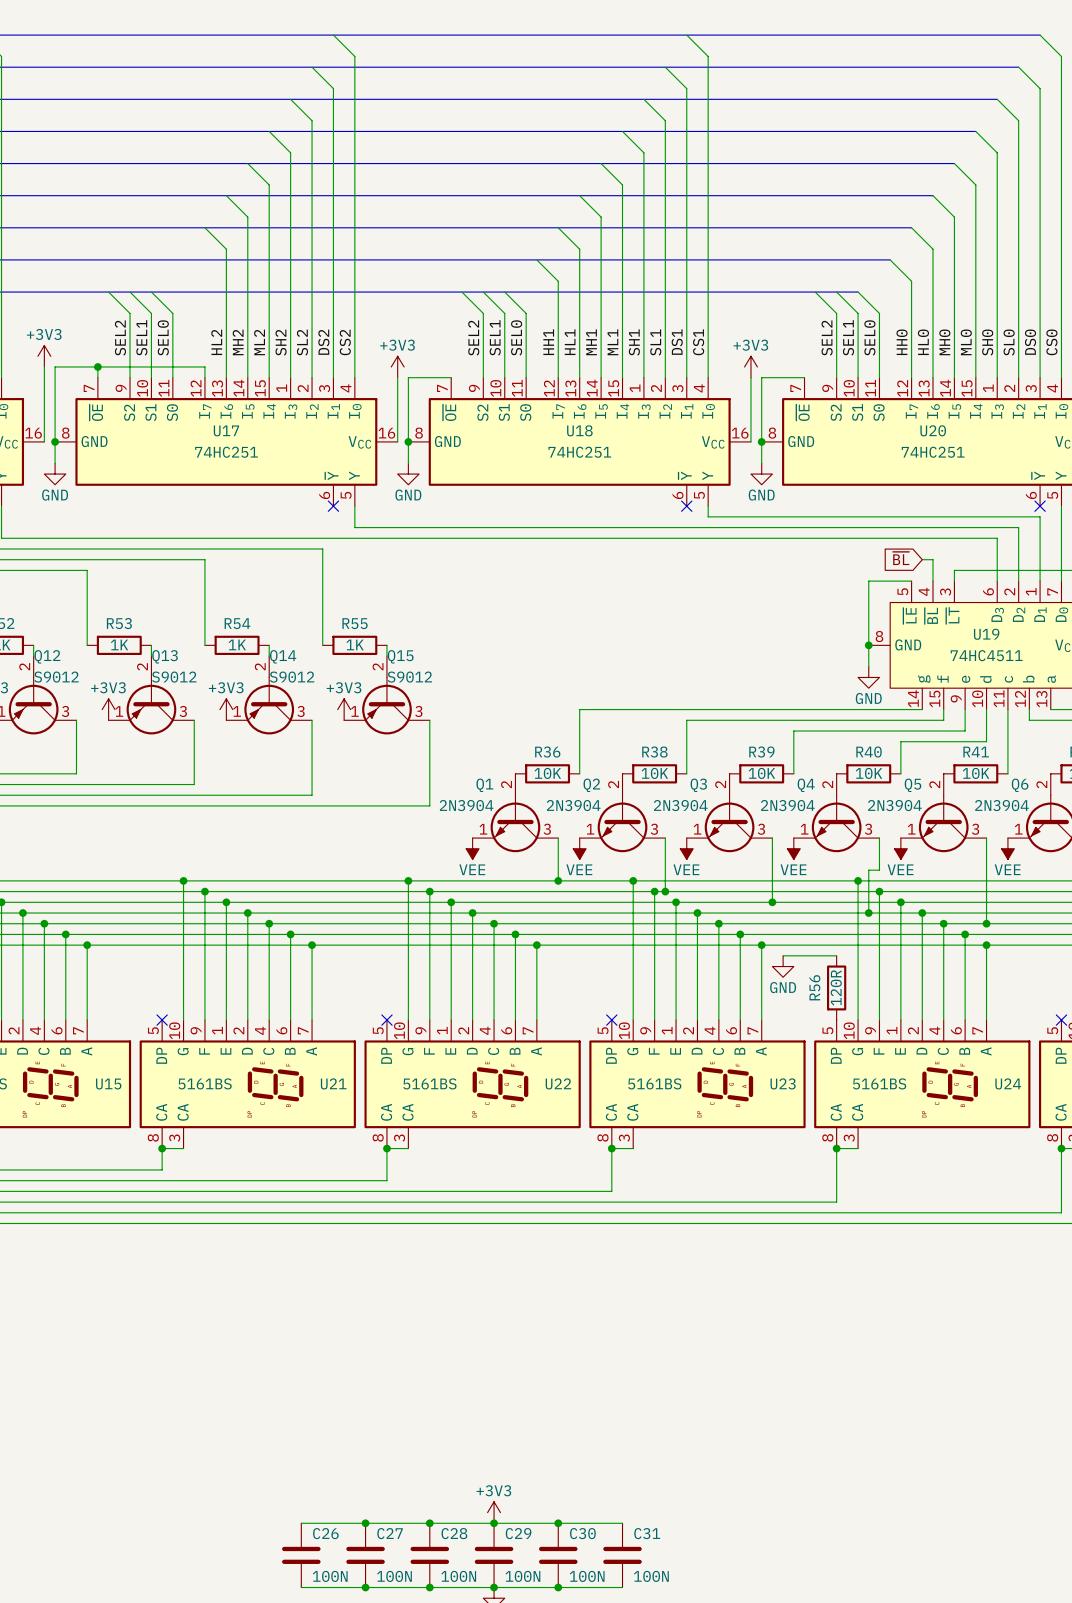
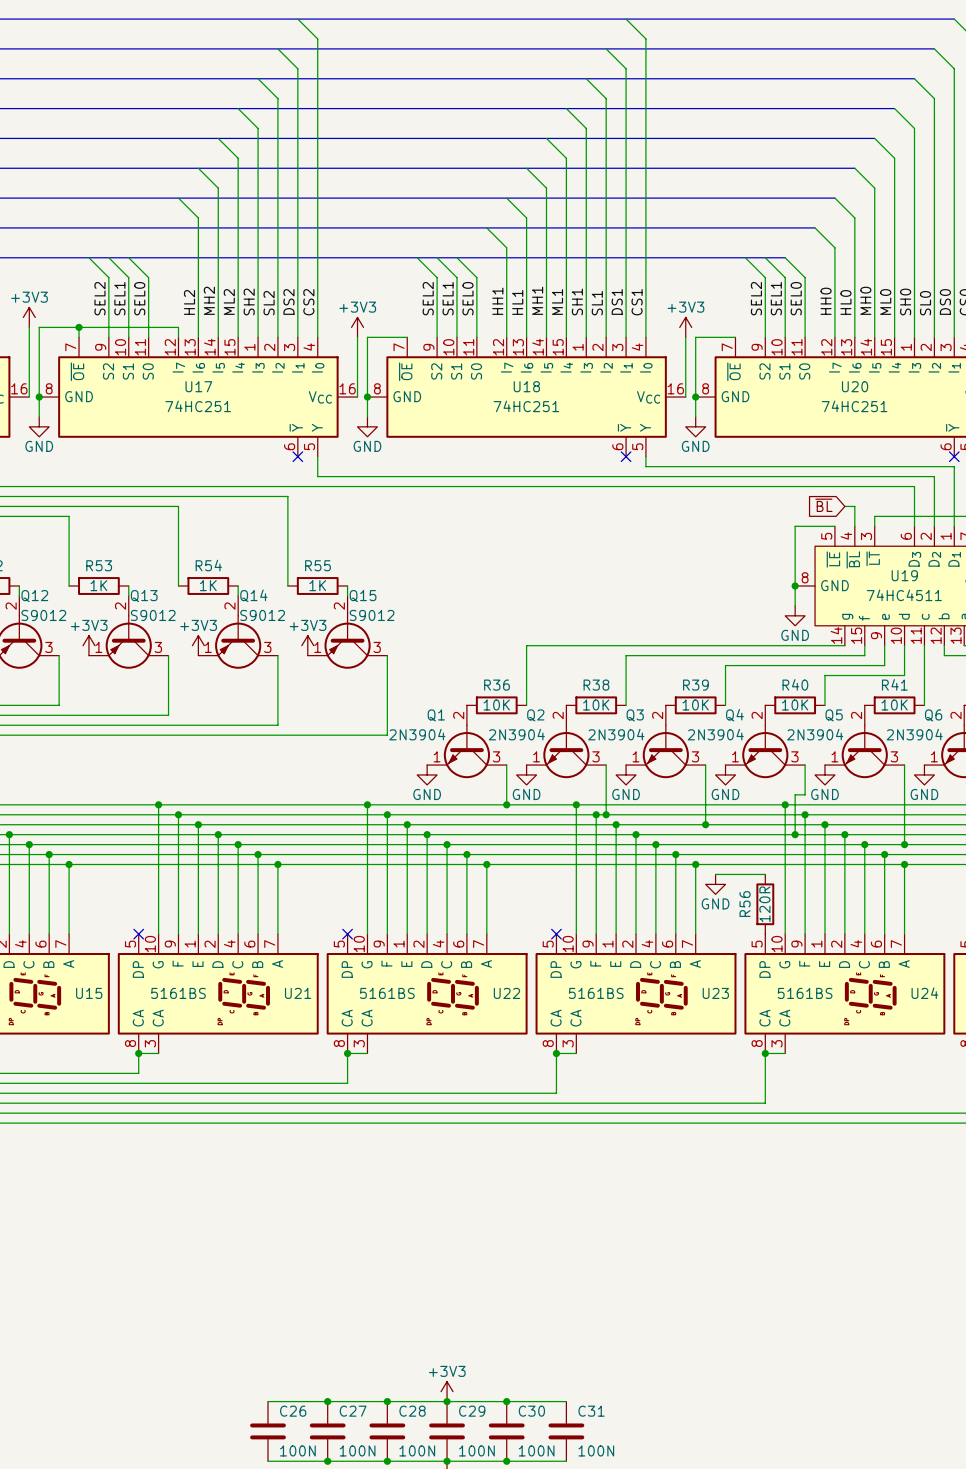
power symbol: VEE (472, 848) -> GND (427, 774)
power symbol: VEE (579, 848) -> GND (526, 774)
power symbol: VEE (686, 848) -> GND (626, 774)
power symbol: VEE (793, 848) -> GND (725, 774)
power symbol: VEE (900, 848) -> GND (824, 774)
power symbol: VEE (1007, 848) -> GND (924, 774)

